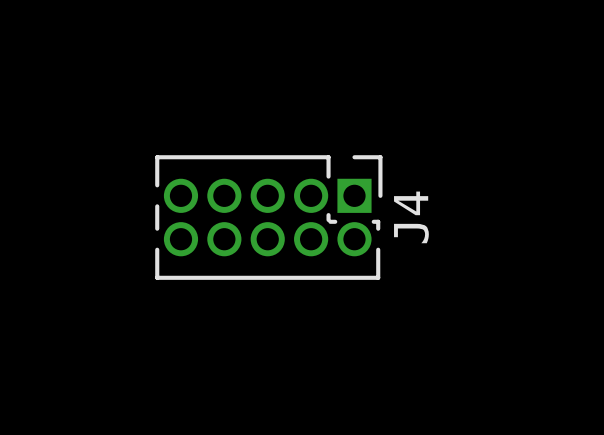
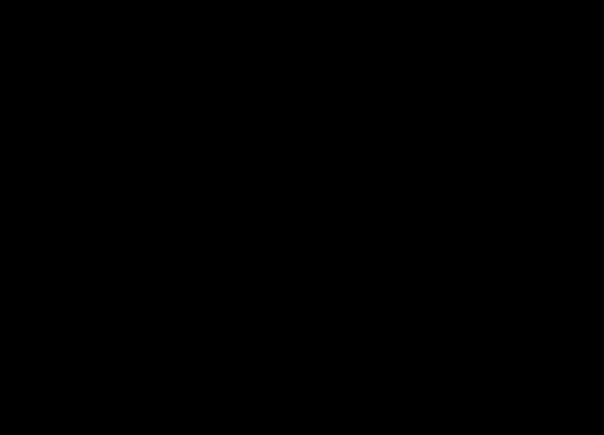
J4: (268, 217) -> none

